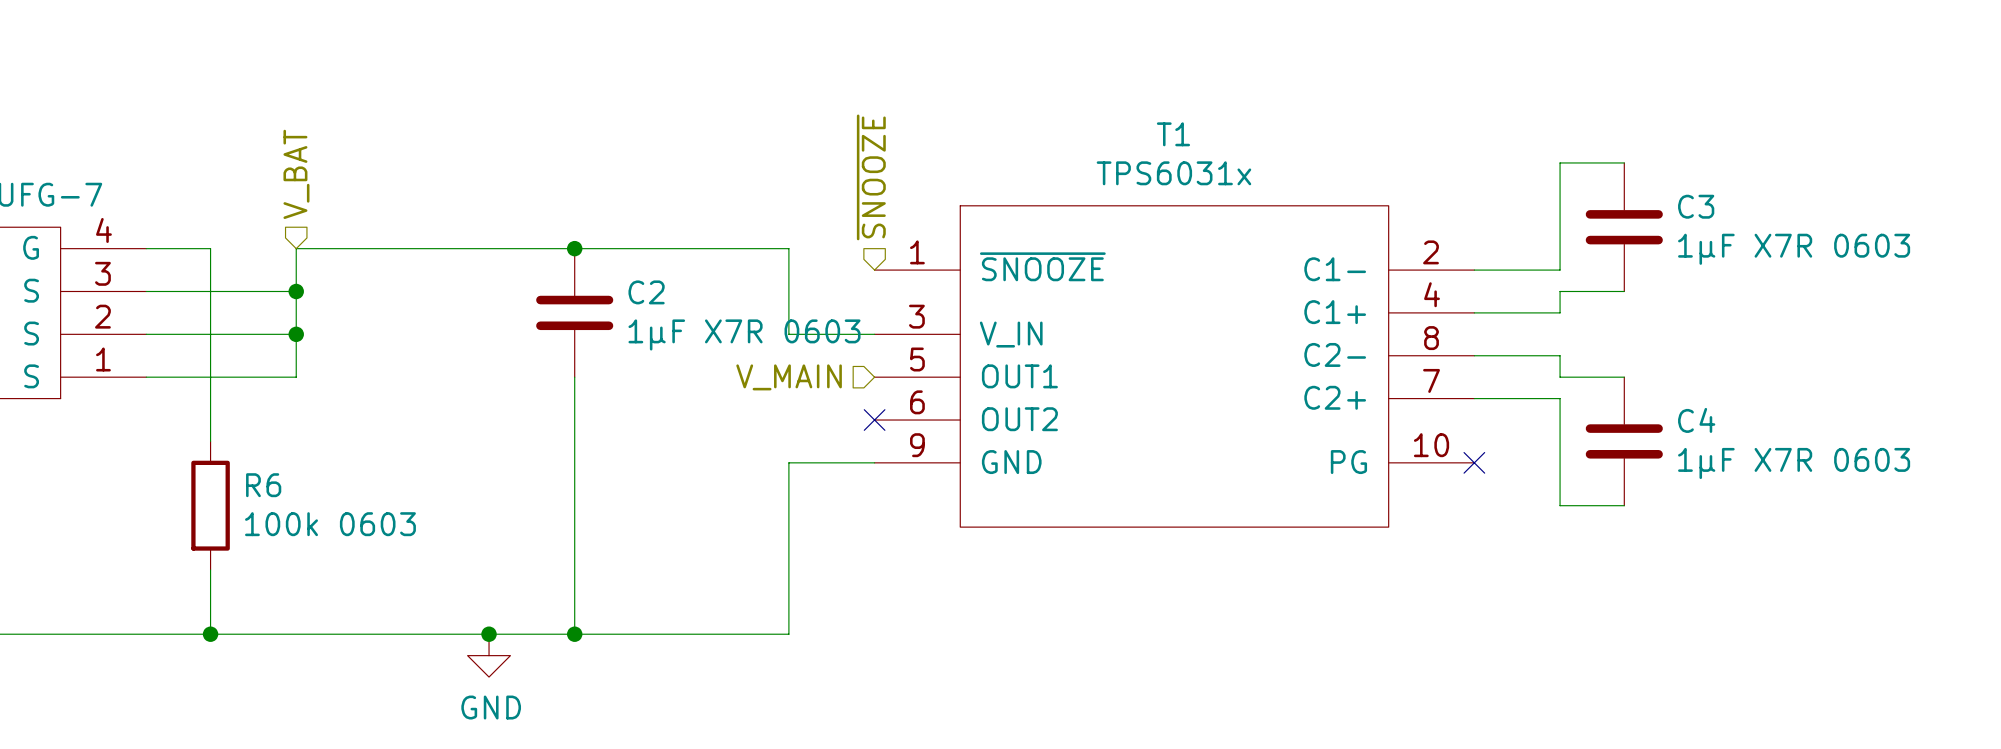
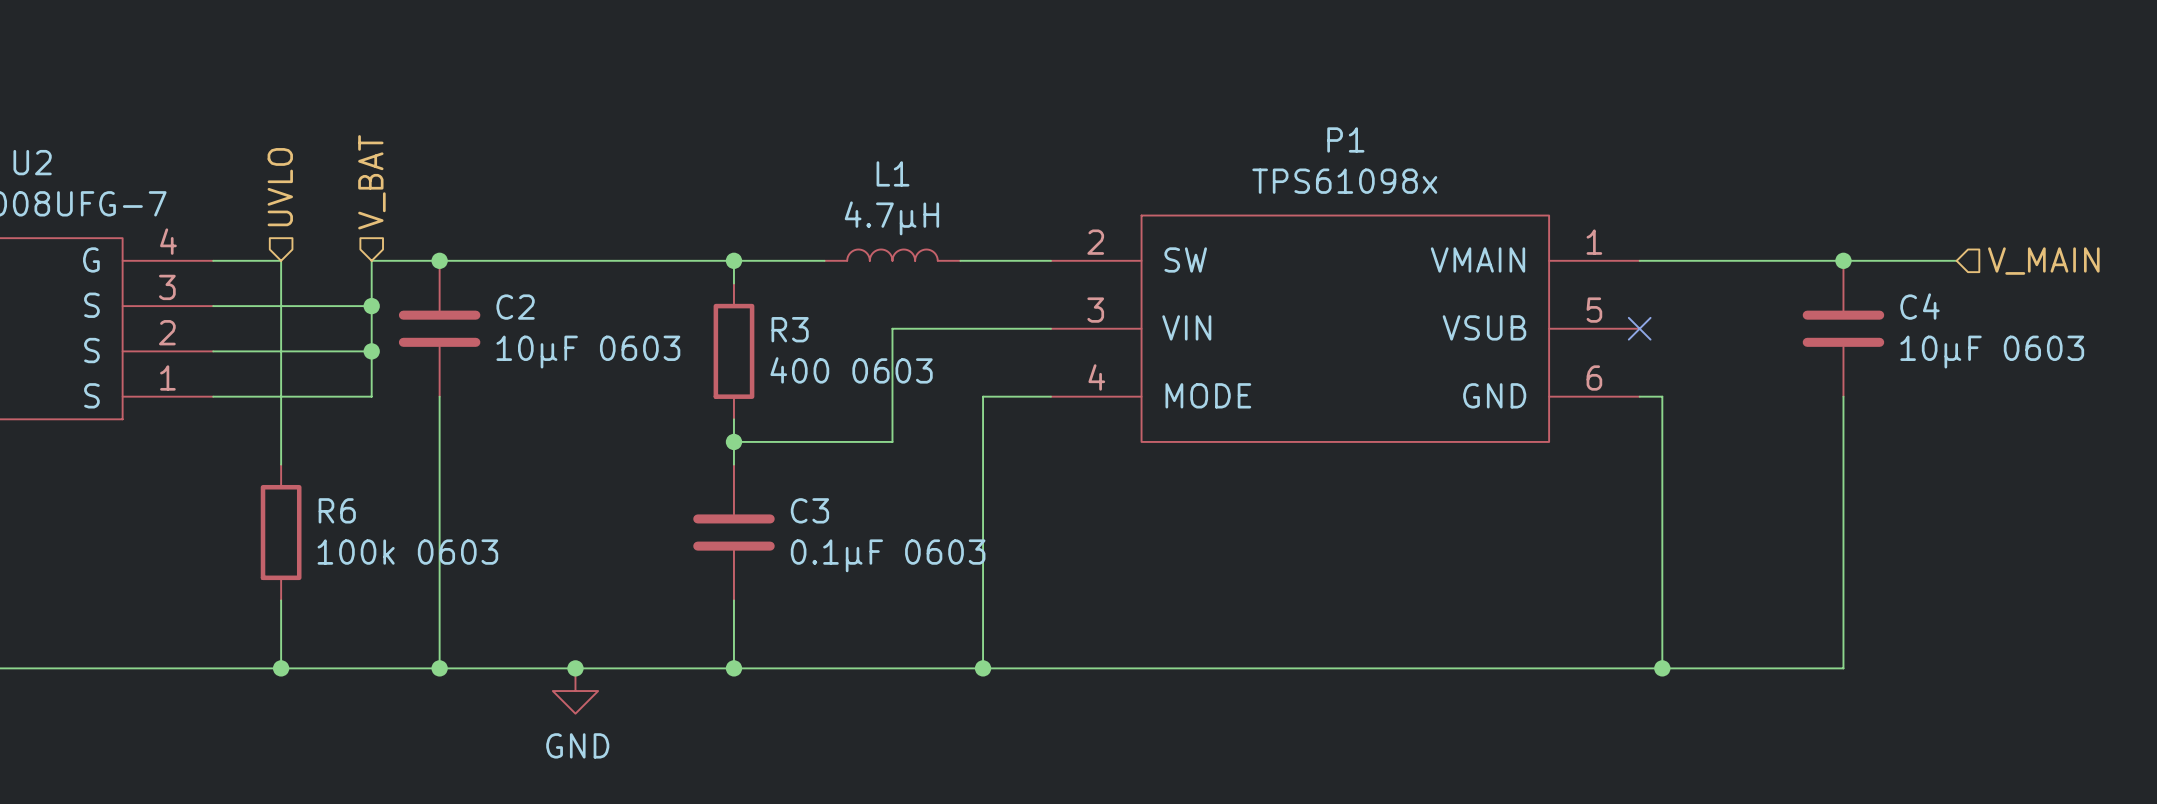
wire: (1624, 162) (1560, 162) (1560, 270) (1474, 270) -> none
hierarchical label: ~{SNOOZE} (871, 177) -> none
hierarchical label: none -> UVLO (280, 187)
C3 position: (1624, 227) -> (733, 532)
L1: none -> 4.7µH (892, 255)
junction: none -> (439, 260)
junction position: (574, 248) -> (733, 260)
wire: none -> (733, 260) (733, 283)
wire: (724, 248) (788, 248) (788, 312) -> (1050, 328) (892, 328)
wire: none -> (960, 260) (1050, 260)
wire: none -> (1639, 260) (1956, 260)
junction: none -> (1843, 260)
hierarchical label: none -> V_MAIN (2043, 261)
C3 value: 1µF X7R 0603 (1794, 249) -> 0.1µF 0603 (888, 555)
wire: (1624, 291) (1560, 291) (1560, 312) (1474, 312) -> none
C2 position: (574, 312) -> (439, 328)
P1: none -> TPS61098x (1345, 328)
no-connect mark: none -> (1639, 328)
R3: none -> 400 0603 (733, 351)
C2 value: 1µF X7R 0603 (744, 334) -> 10µF 0603 (588, 352)
wire: (788, 334) (874, 334) -> (892, 351) (892, 441) (733, 441)
wire: (1474, 355) (1560, 355) (1560, 377) (1624, 377) -> none
T1: TPS6031x (1174, 366) -> none
wire: (574, 377) (574, 634) -> (439, 396) (439, 668)
hierarchical label: V_MAIN (789, 377) -> none
wire: none -> (1050, 396) (983, 396) (983, 668)
wire: none -> (1639, 396) (1662, 396) (1662, 668)
wire: none -> (733, 419) (733, 464)
wire: (1474, 398) (1560, 398) (1560, 505) (1624, 505) -> none
junction: none -> (733, 441)
no-connect mark: (874, 420) -> none
C4 position: (1624, 441) -> (1843, 328)
wire: (874, 462) (788, 462) (788, 634) -> (1843, 396) (1843, 668) (892, 668)
no-connect mark: (1474, 462) -> none
C4 value: 1µF X7R 0603 (1794, 463) -> 10µF 0603 (1992, 352)
wire: none -> (733, 600) (733, 668)
junction: none -> (439, 668)
junction position: (574, 634) -> (733, 668)
junction: none -> (983, 668)
junction: none -> (1662, 668)

